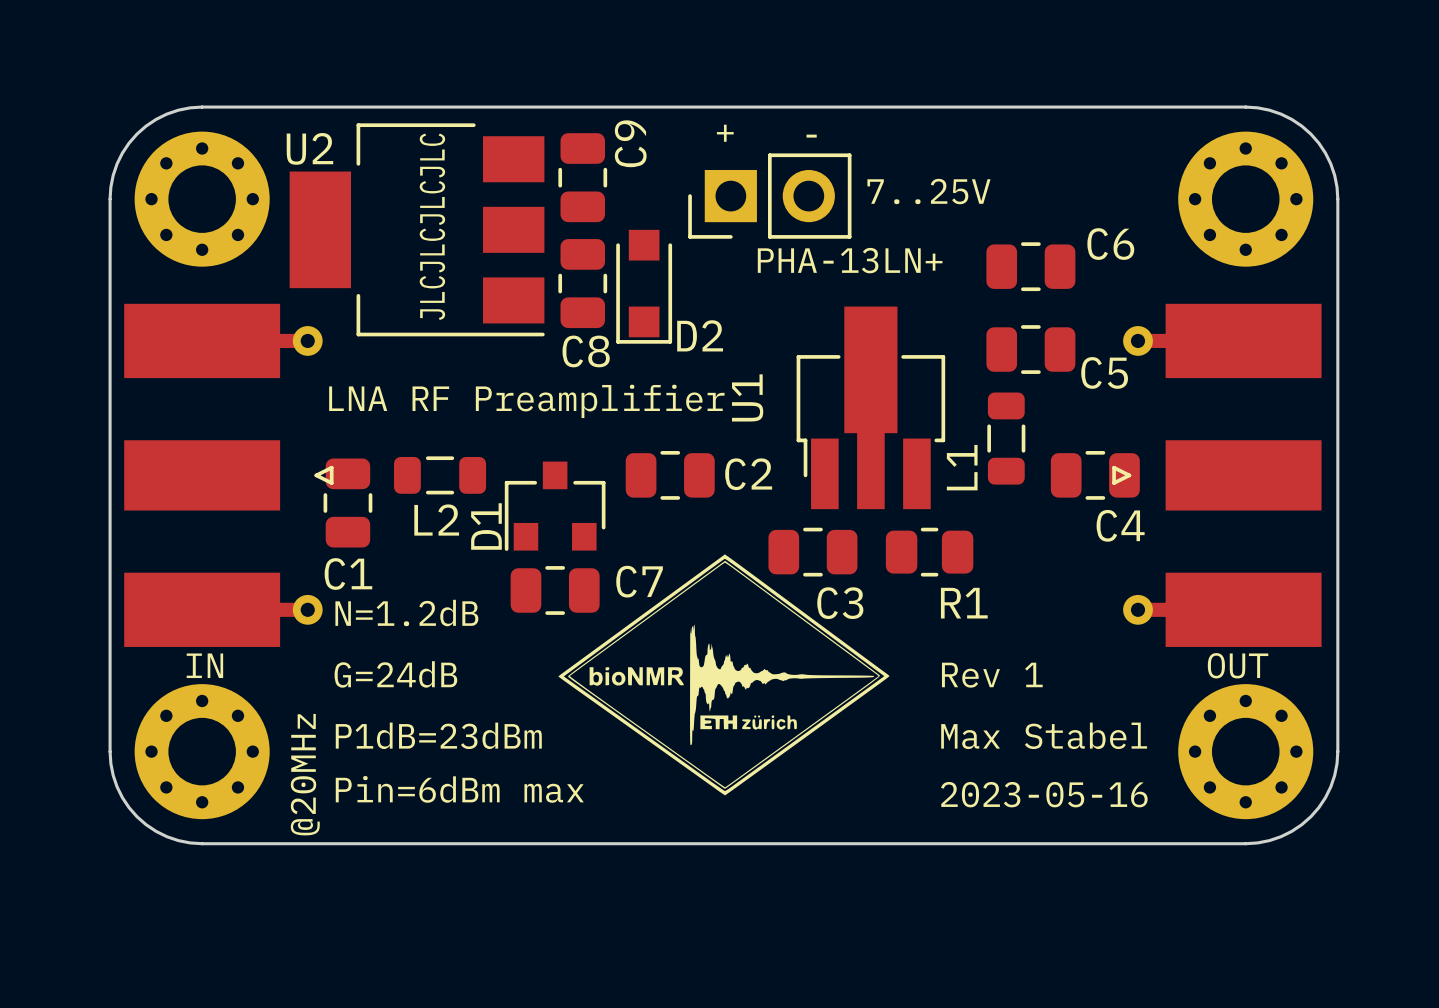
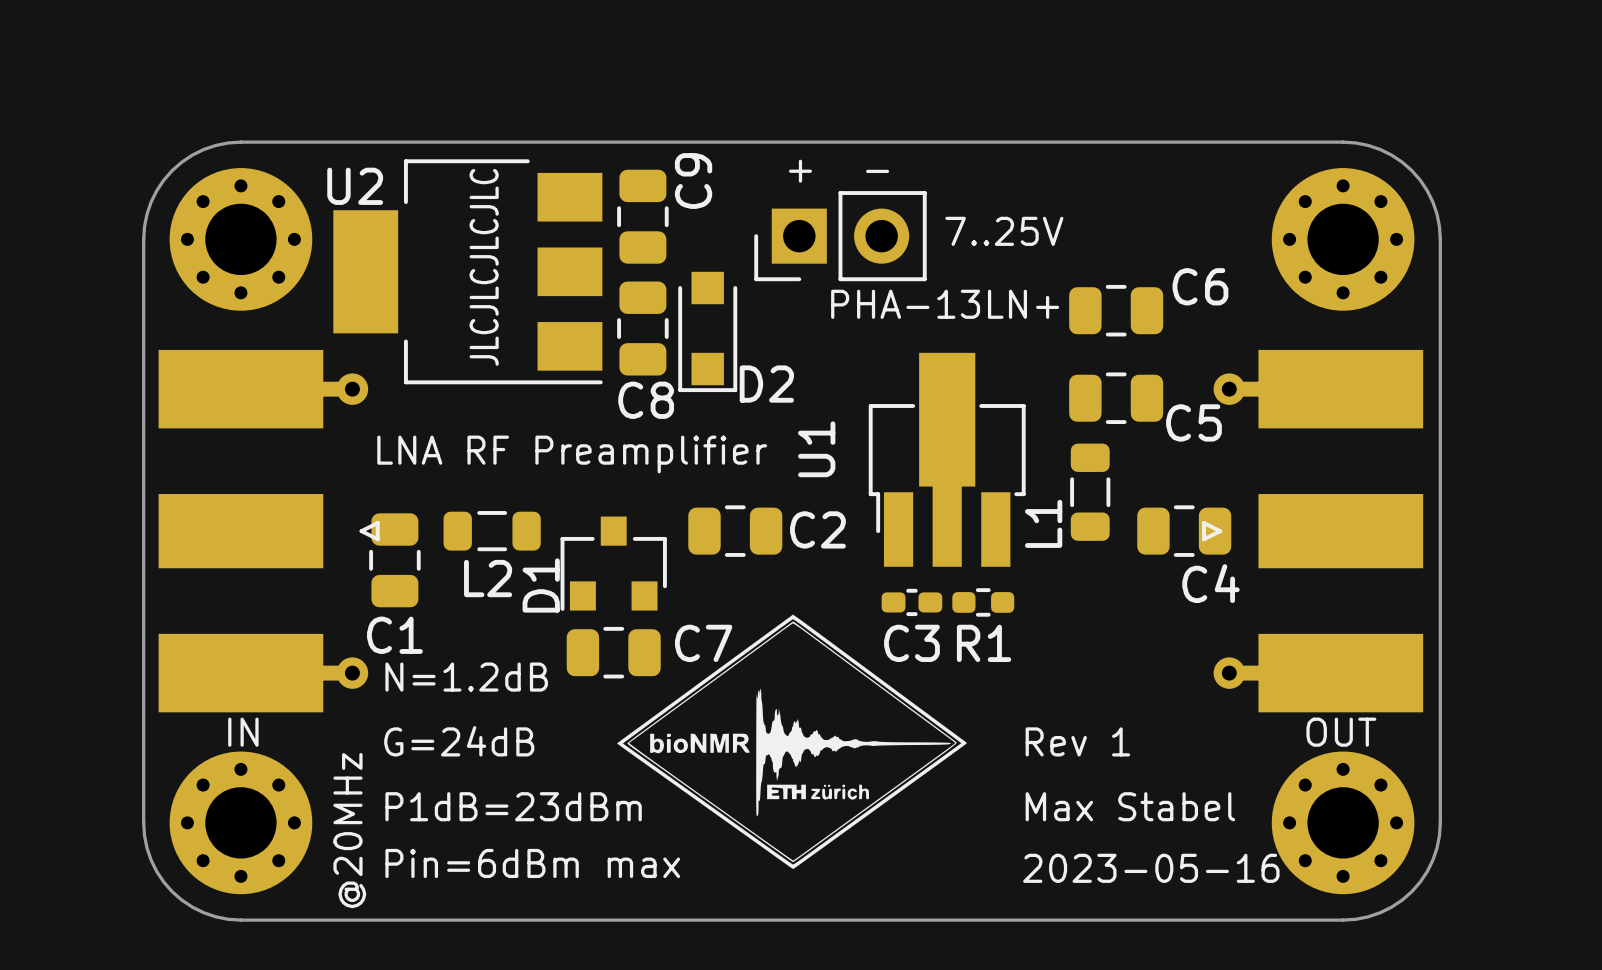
C3 footprint: [768, 527, 858, 577] -> [881, 588, 943, 617]
R1 footprint: [885, 527, 974, 577] -> [952, 588, 1015, 617]

